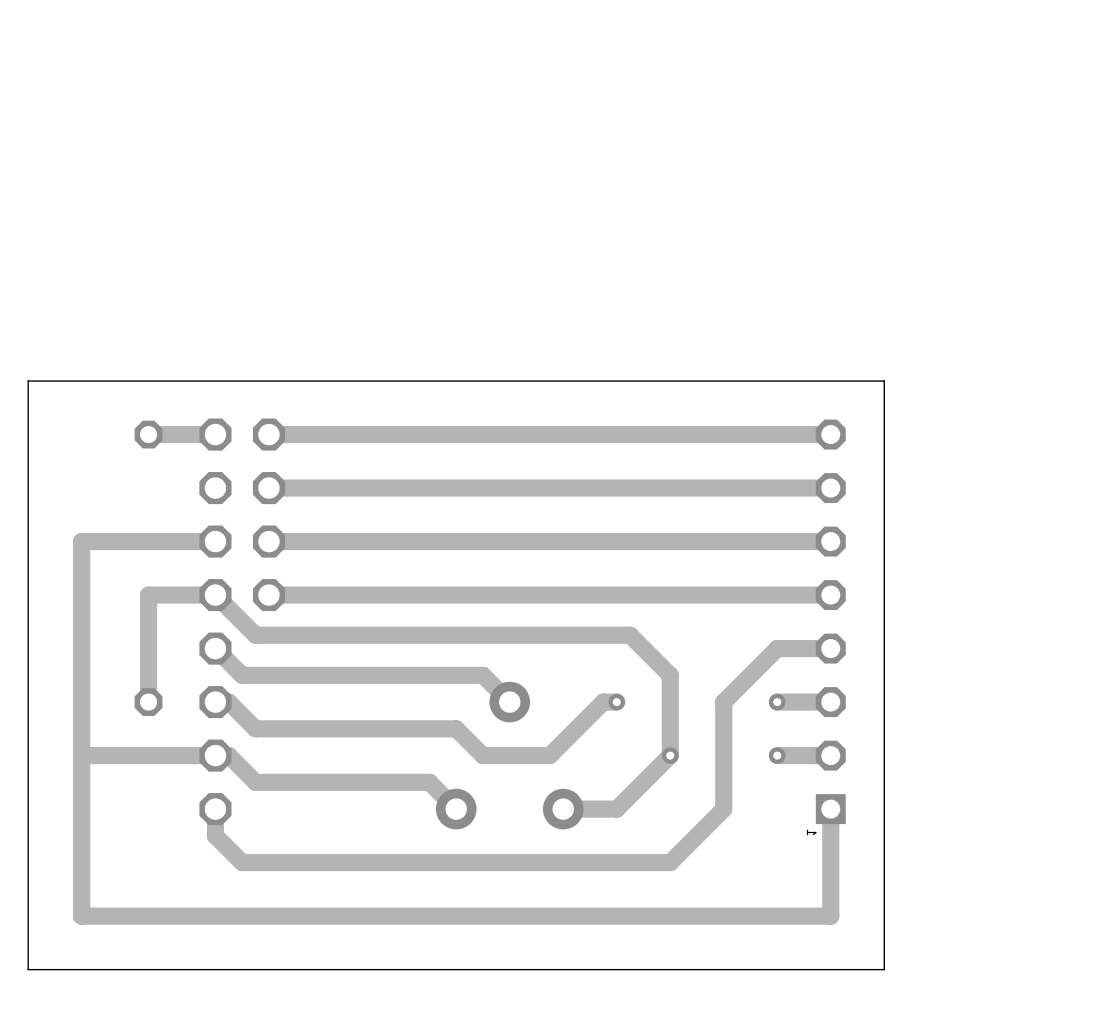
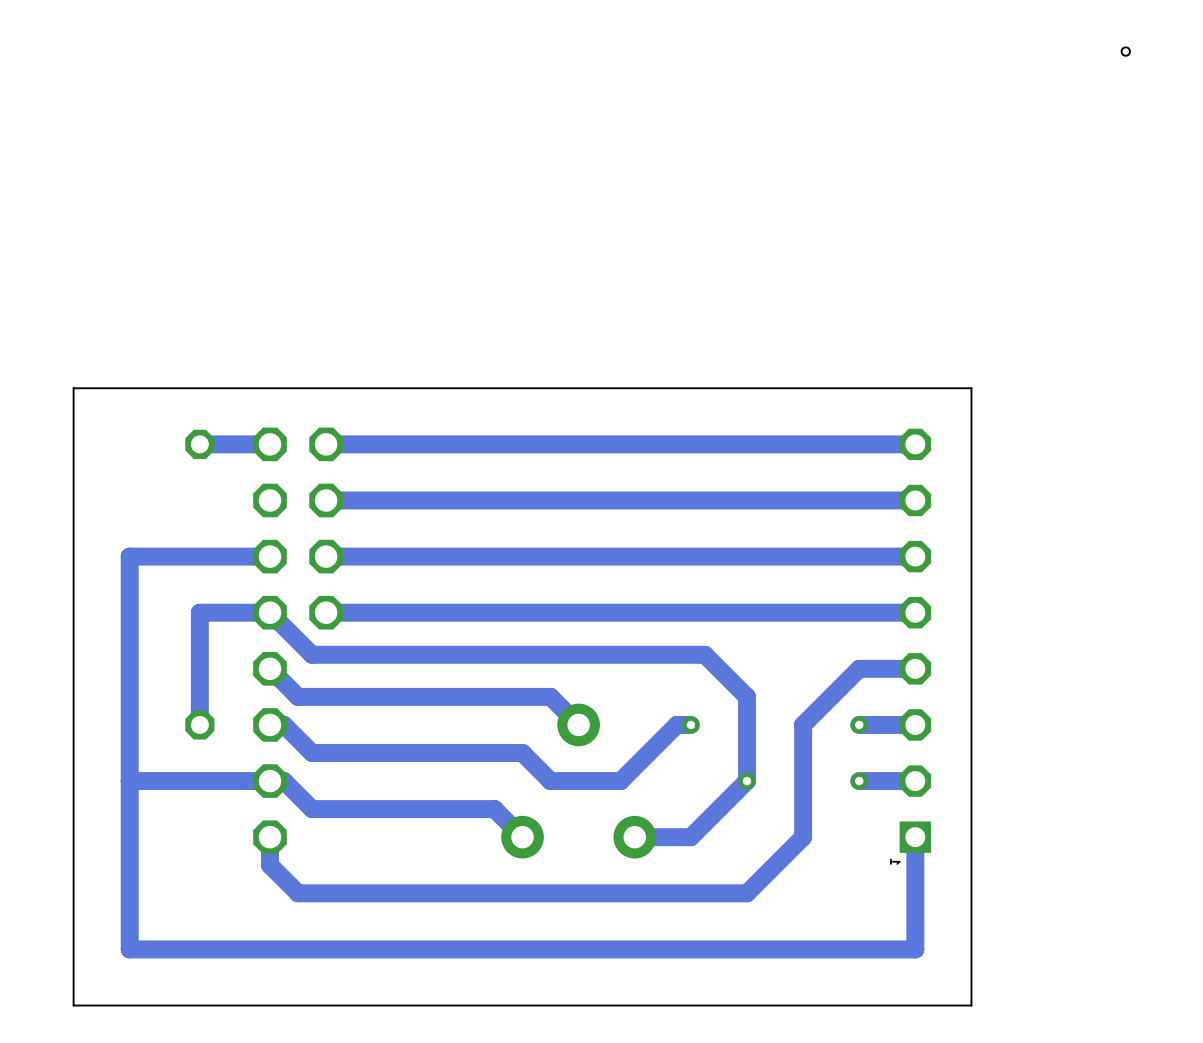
hole: none -> (1125, 51)

